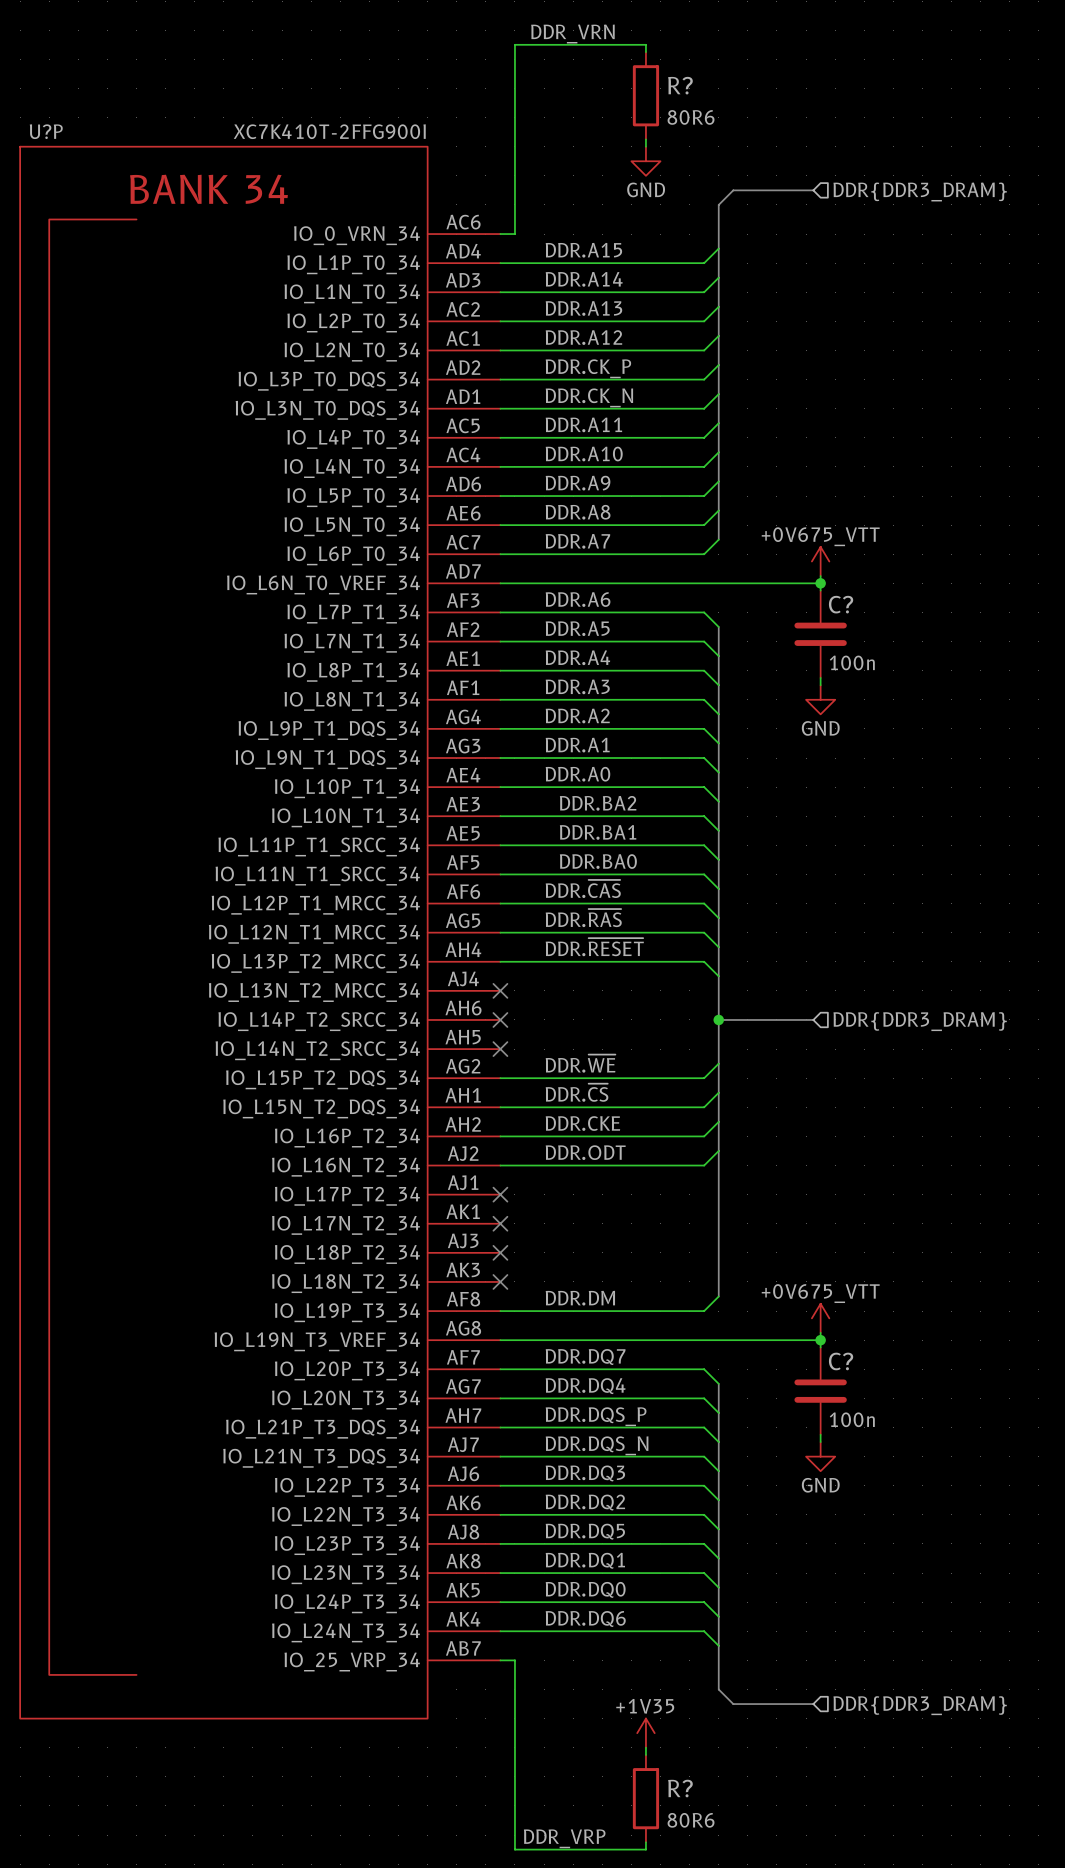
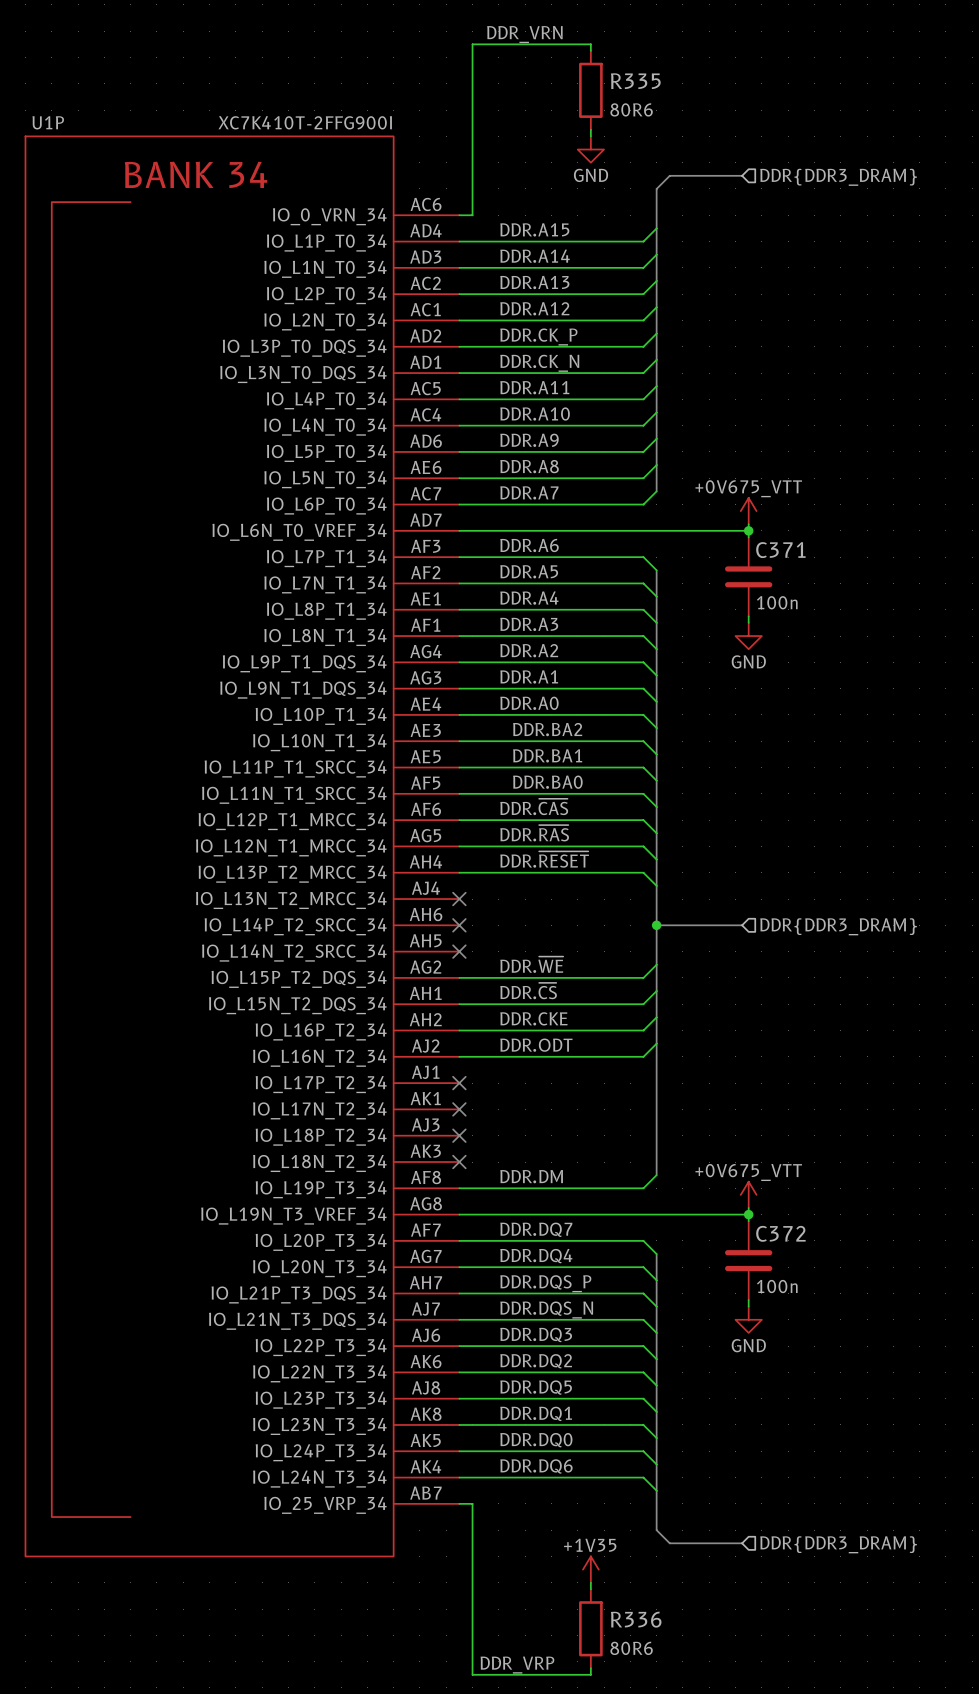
R? name: R? (680, 85) -> R335 (635, 81)
U?P name: U?P (46, 131) -> U1P (48, 122)
C? name: C? (841, 604) -> C371 (780, 550)
C? name: C? (841, 1361) -> C372 (780, 1233)
R? name: R? (680, 1788) -> R336 (636, 1619)

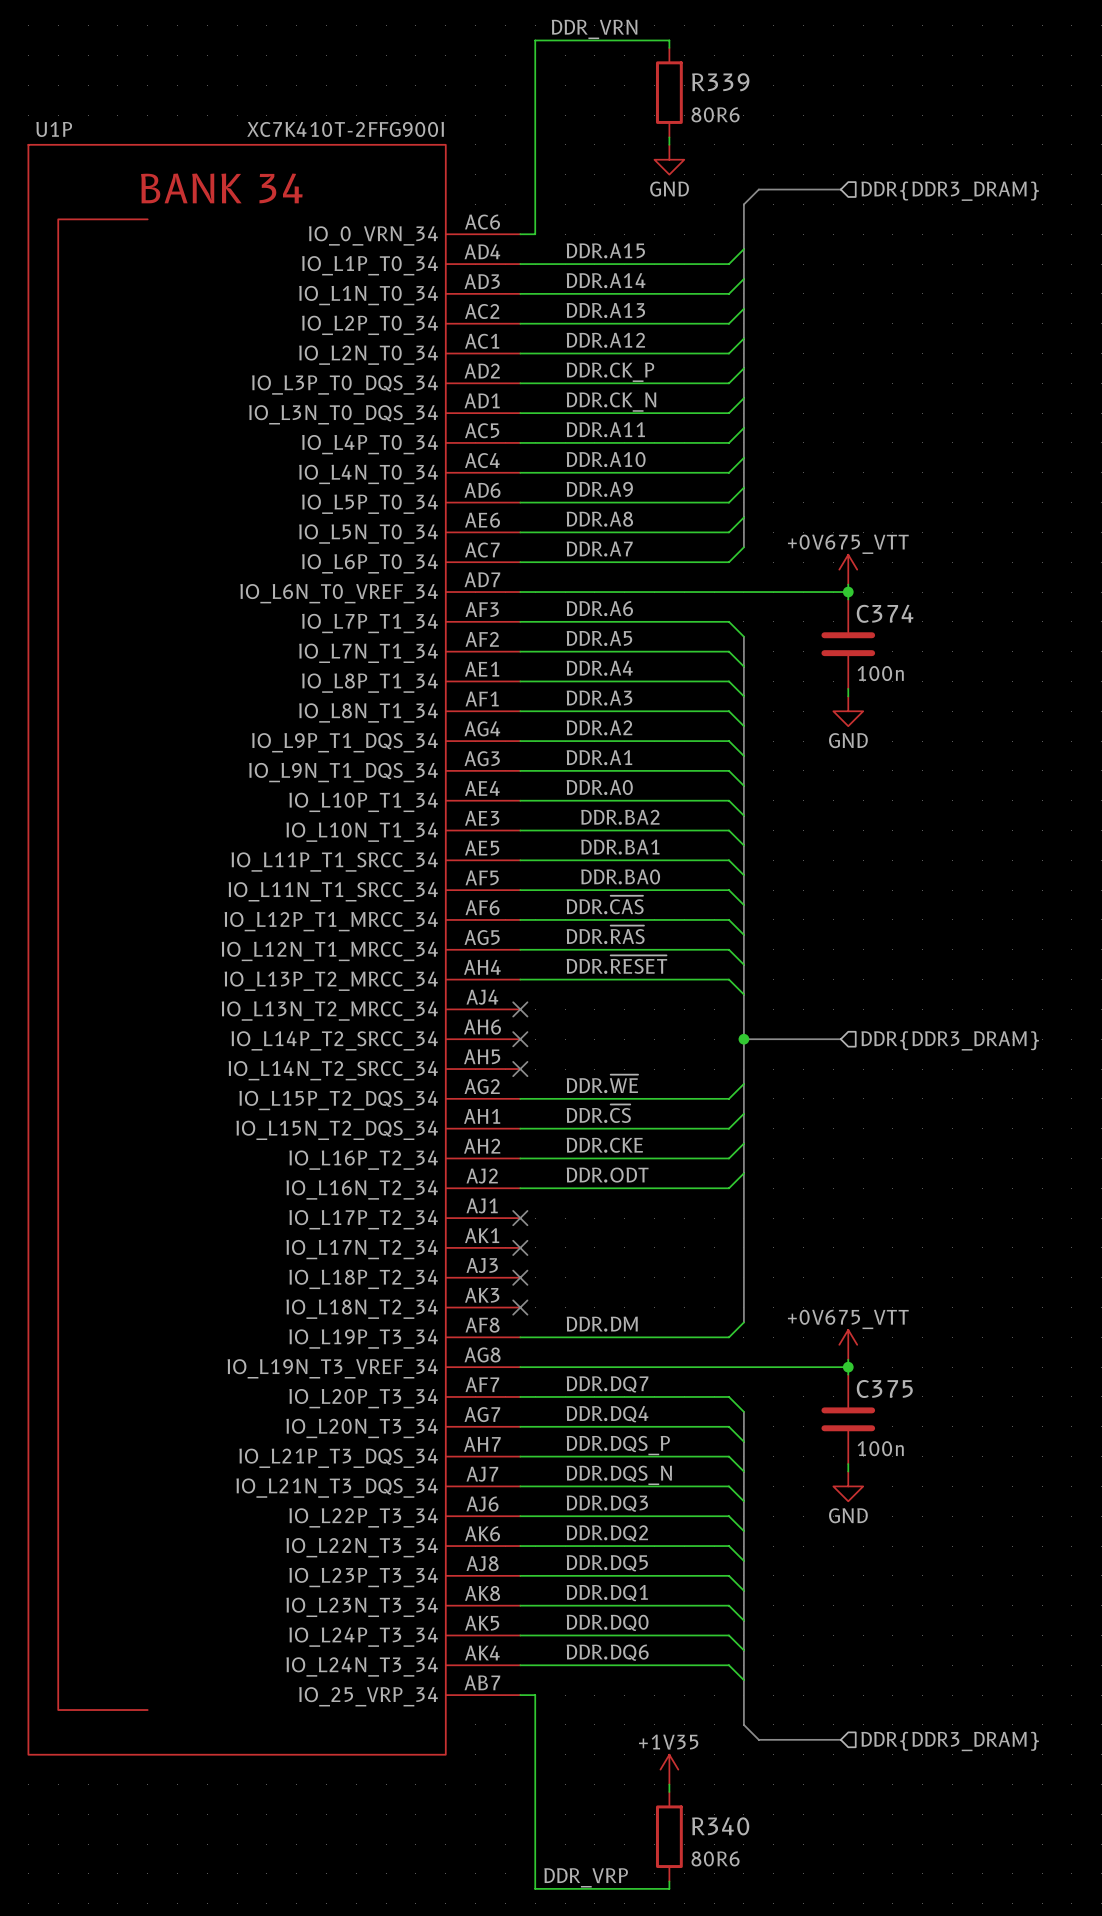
R335 name: R335 (635, 81) -> R339 (720, 82)
C371 name: C371 (780, 550) -> C374 (885, 613)
C372 name: C372 (780, 1233) -> C375 (884, 1388)
R336 name: R336 (636, 1619) -> R340 (720, 1826)

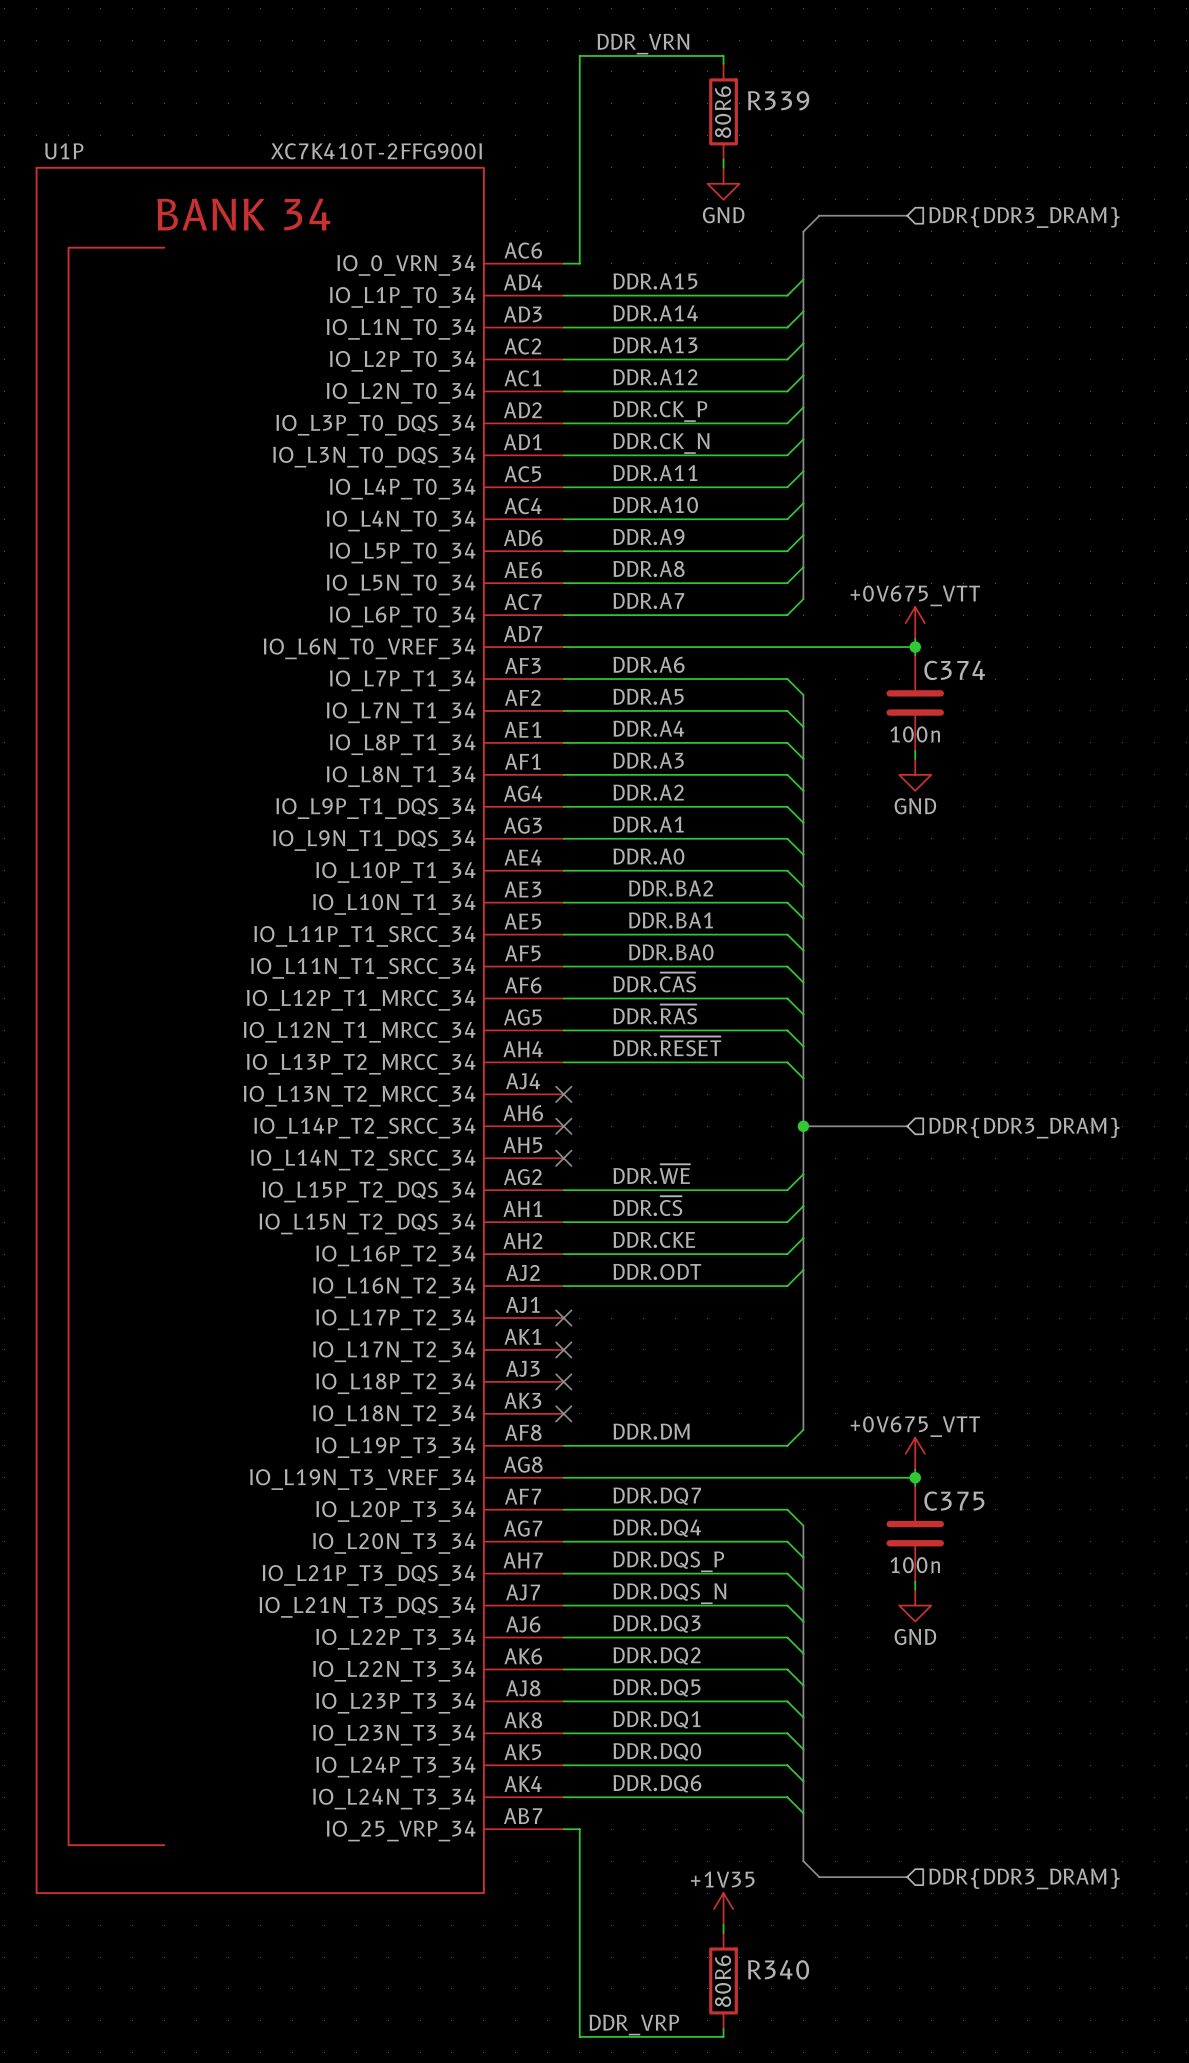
R339 text rotation: 0° (715, 114) -> 90° counterclockwise (723, 112)
C374 text position: 100n (880, 673) -> 100n (915, 734)
C375 text position: 100n (880, 1448) -> 100n (915, 1565)
R340 text rotation: 0° (715, 1858) -> 90° counterclockwise (723, 1981)

